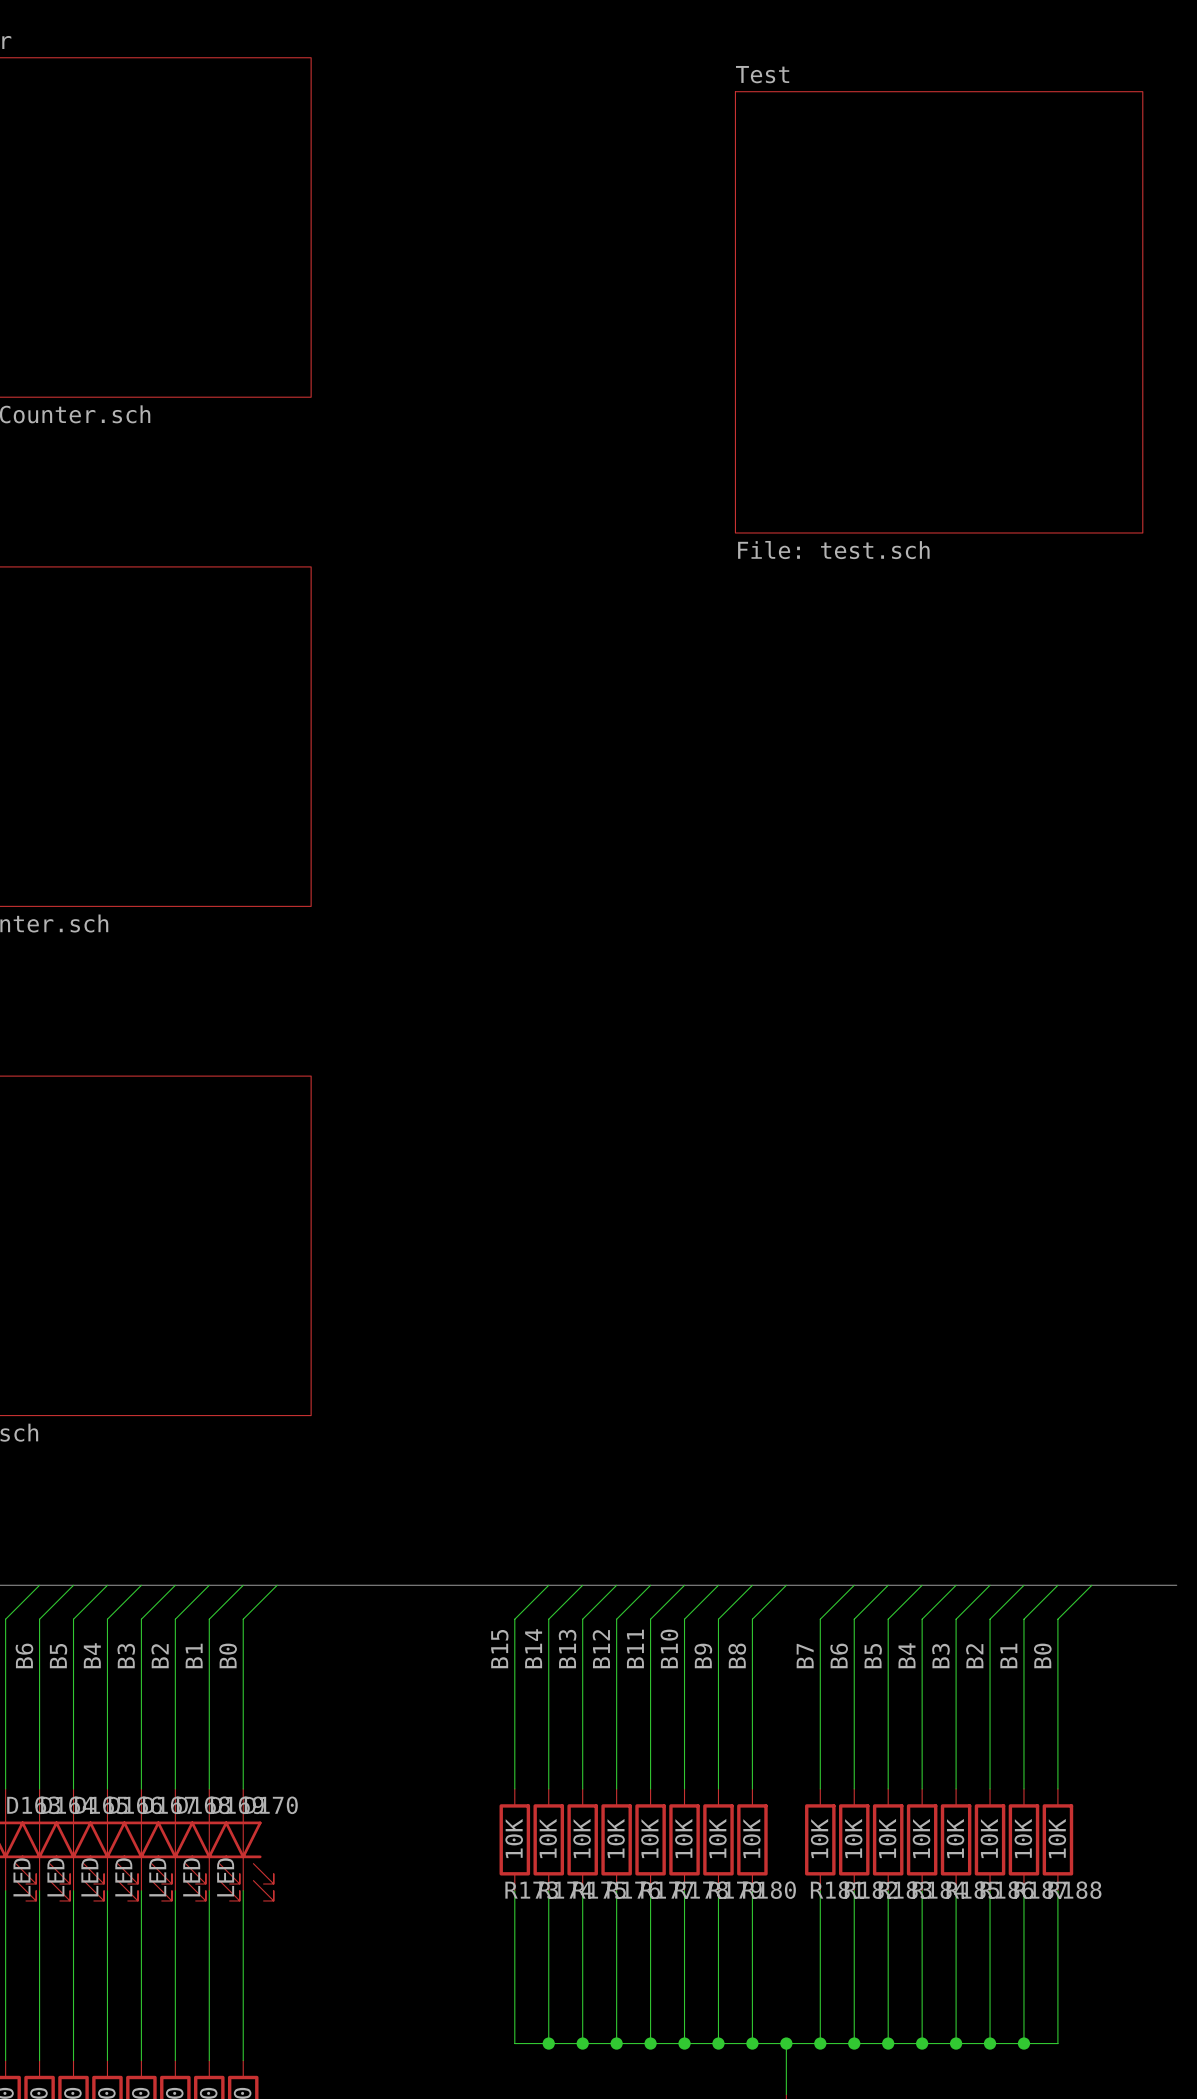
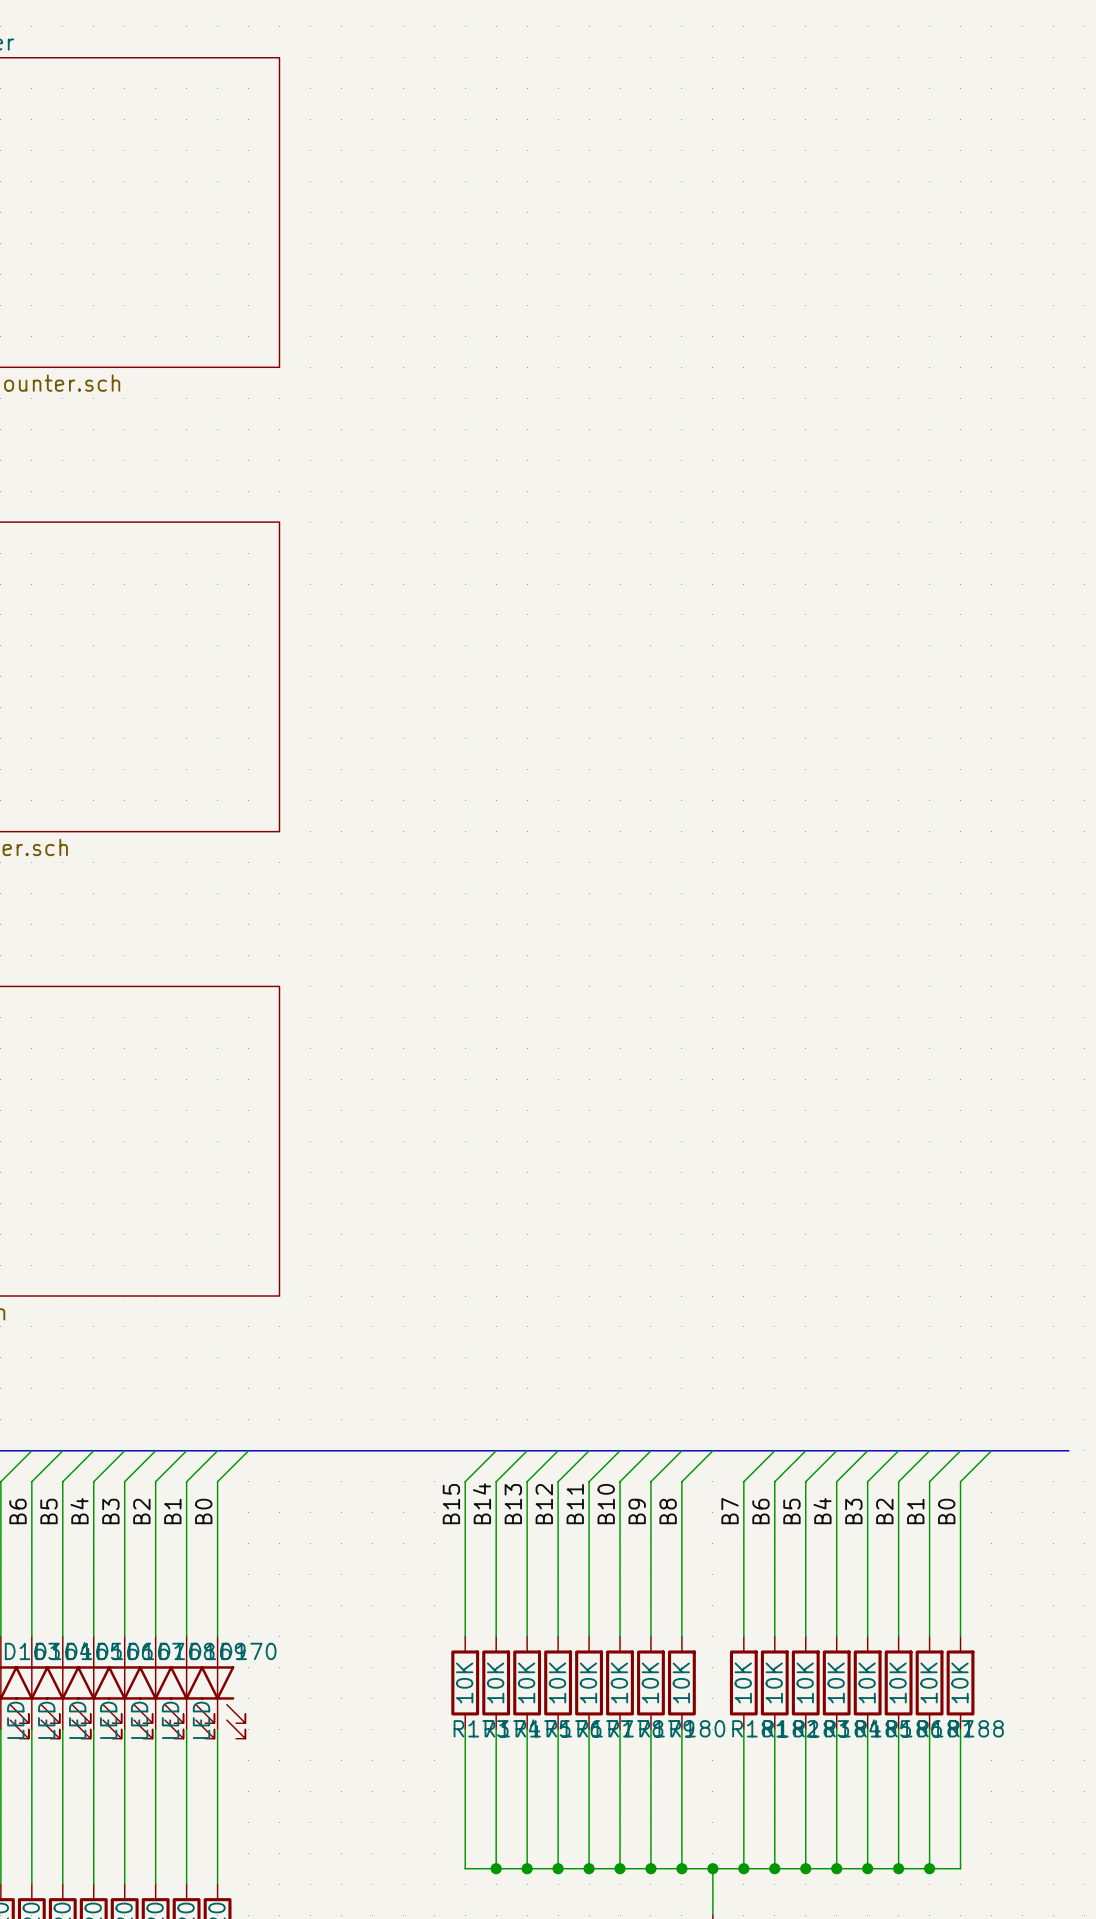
sheet Test: File: test.sch (939, 312) -> none

